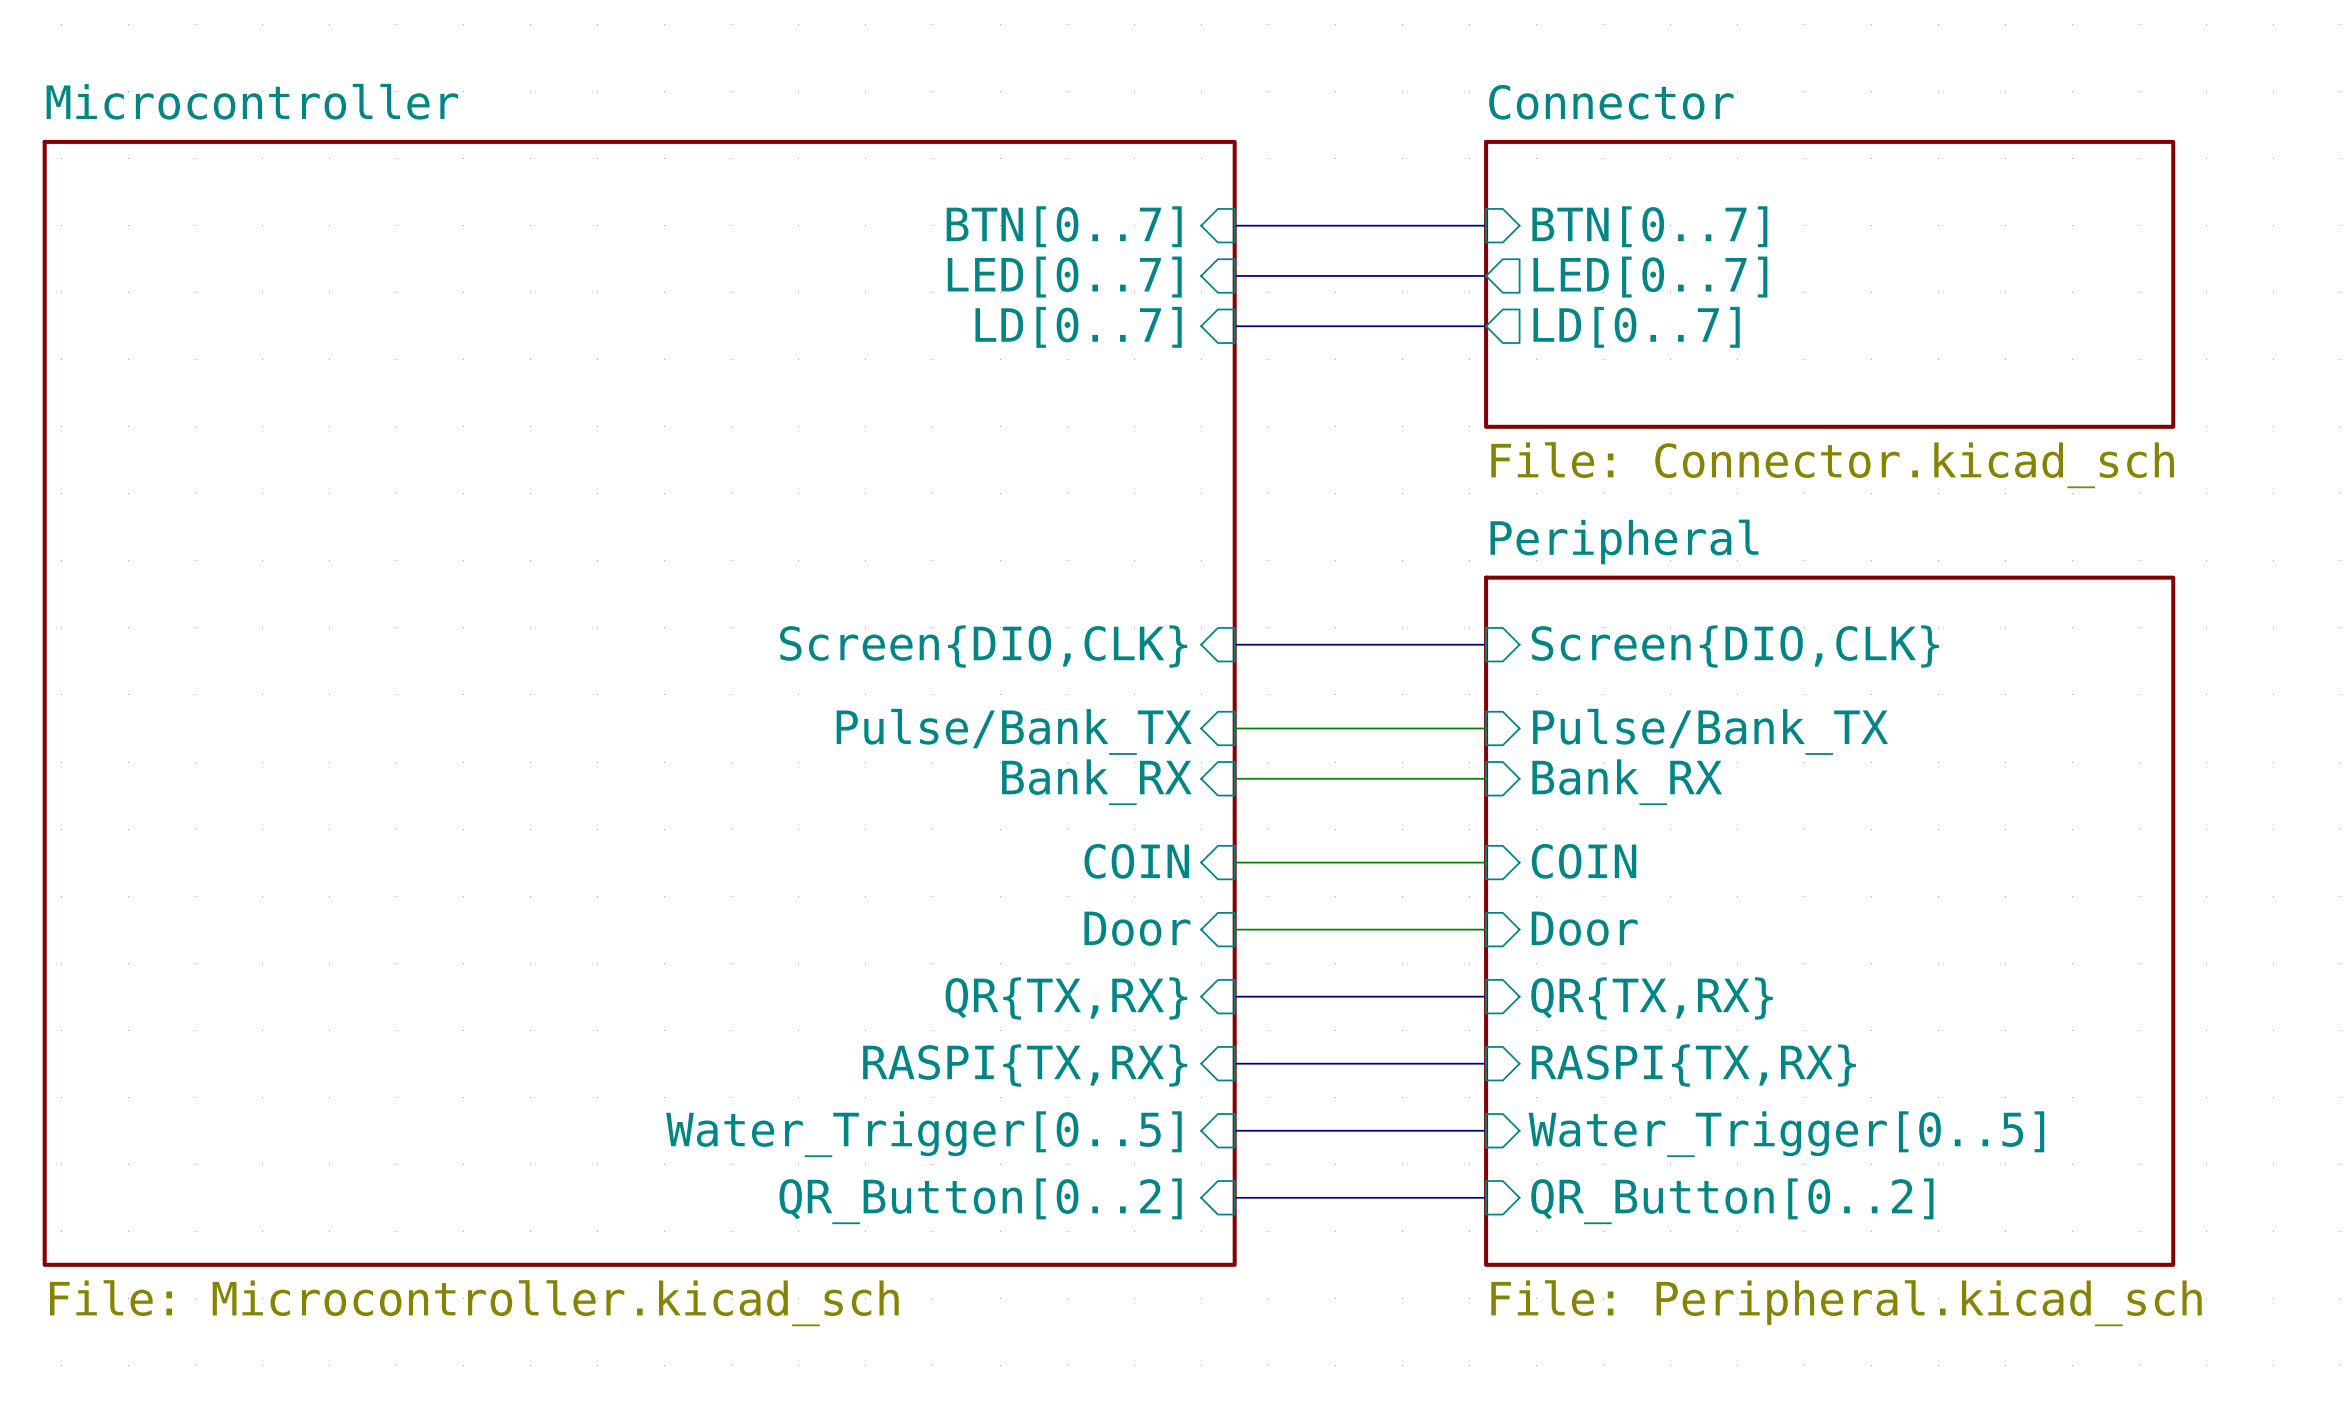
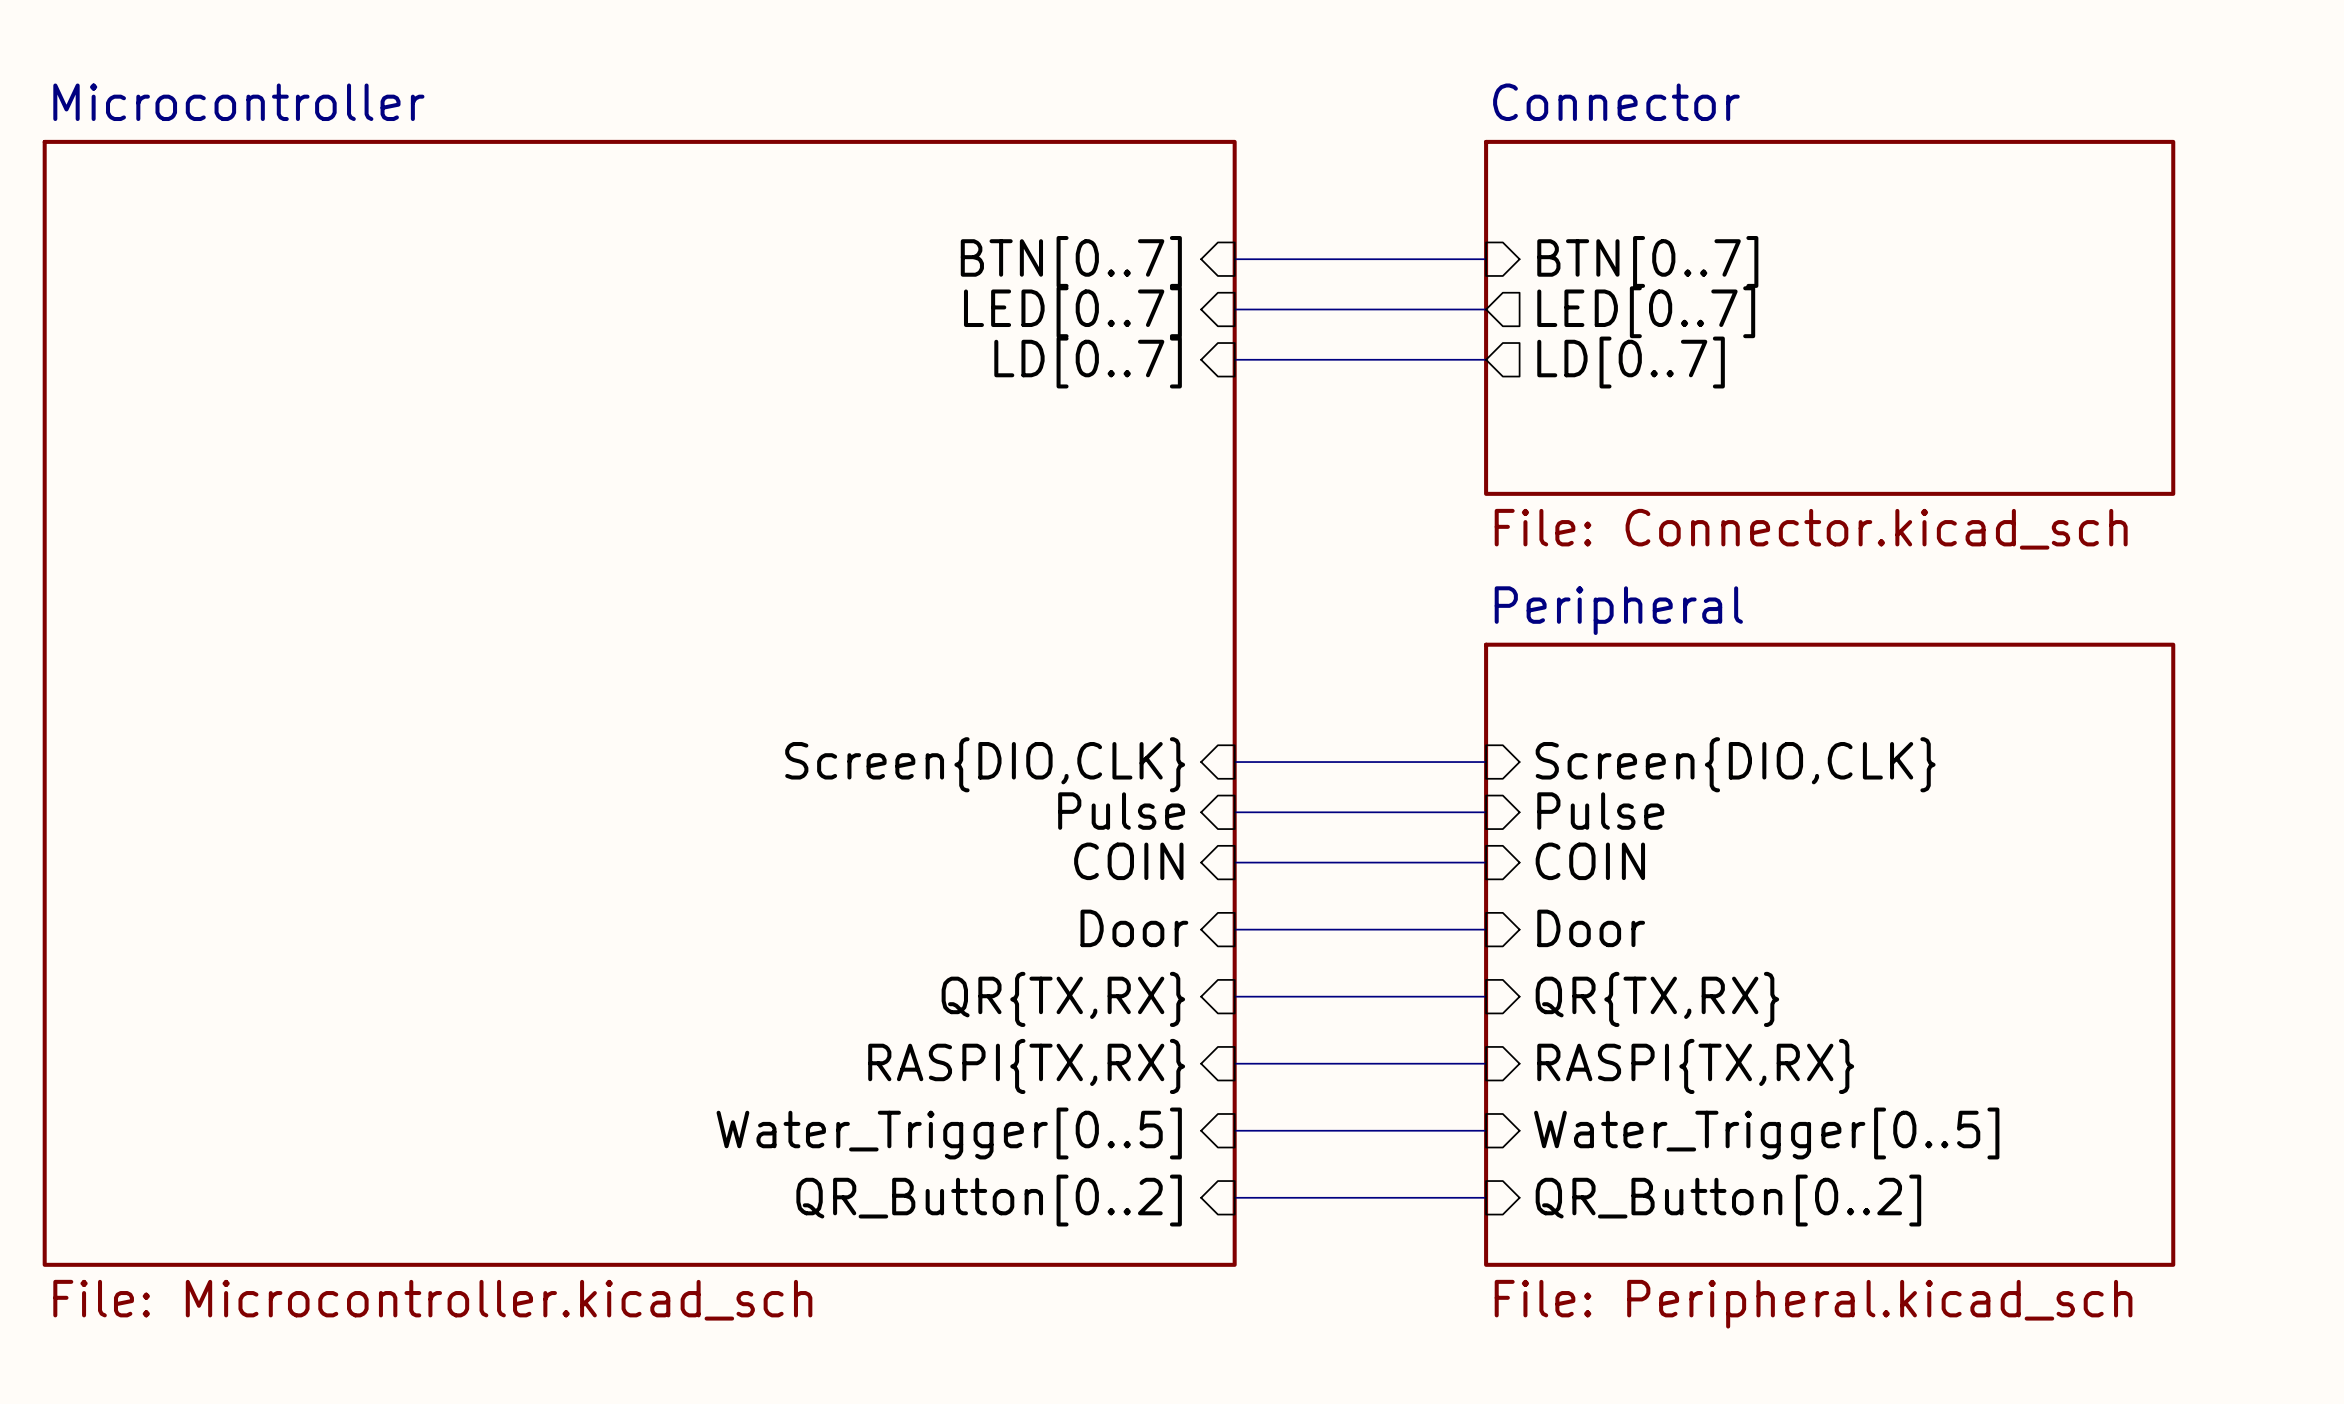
bus: (1234, 225) (1486, 225) -> (1234, 259) (1486, 259)
sheet pin position: BTN[0..7] (1064, 226) -> BTN[0..7] (1071, 261)
sheet pin position: BTN[0..7] (1649, 226) -> BTN[0..7] (1647, 261)
bus: (1234, 275) (1486, 275) -> (1234, 309) (1486, 309)
sheet pin position: LED[0..7] (1064, 277) -> LED[0..7] (1072, 312)
sheet pin position: LED[0..7] (1650, 277) -> LED[0..7] (1646, 312)
sheet Connector: File: Connector.kicad_sch (1829, 284) -> none
sheet Connector: none -> File: Connector.kicad_sch (1829, 317)
bus: (1234, 326) (1486, 326) -> (1234, 359) (1486, 359)
sheet pin position: LD[0..7] (1078, 327) -> LD[0..7] (1088, 362)
sheet pin position: LD[0..7] (1636, 327) -> LD[0..7] (1631, 362)
bus: (1234, 644) (1486, 644) -> (1234, 762) (1486, 762)
sheet pin position: Screen{DIO,CLK} (983, 646) -> Screen{DIO,CLK} (985, 764)
sheet pin position: Screen{DIO,CLK} (1735, 646) -> Screen{DIO,CLK} (1735, 764)
wire: (1234, 728) (1486, 728) -> none
sheet pin: Pulse/Bank_TX (1014, 731) -> none
sheet pin: Pulse/Bank_TX (1710, 731) -> none
wire: (1234, 778) (1486, 778) -> (1234, 812) (1486, 812)
sheet pin: Bank_RX (1096, 782) -> none
sheet pin: Bank_RX (1627, 782) -> none
sheet pin: none -> Pulse (1121, 811)
sheet pin: none -> Pulse (1600, 811)
sheet Peripheral: File: Peripheral.kicad_sch (1829, 921) -> none
sheet Peripheral: none -> File: Peripheral.kicad_sch (1829, 954)

